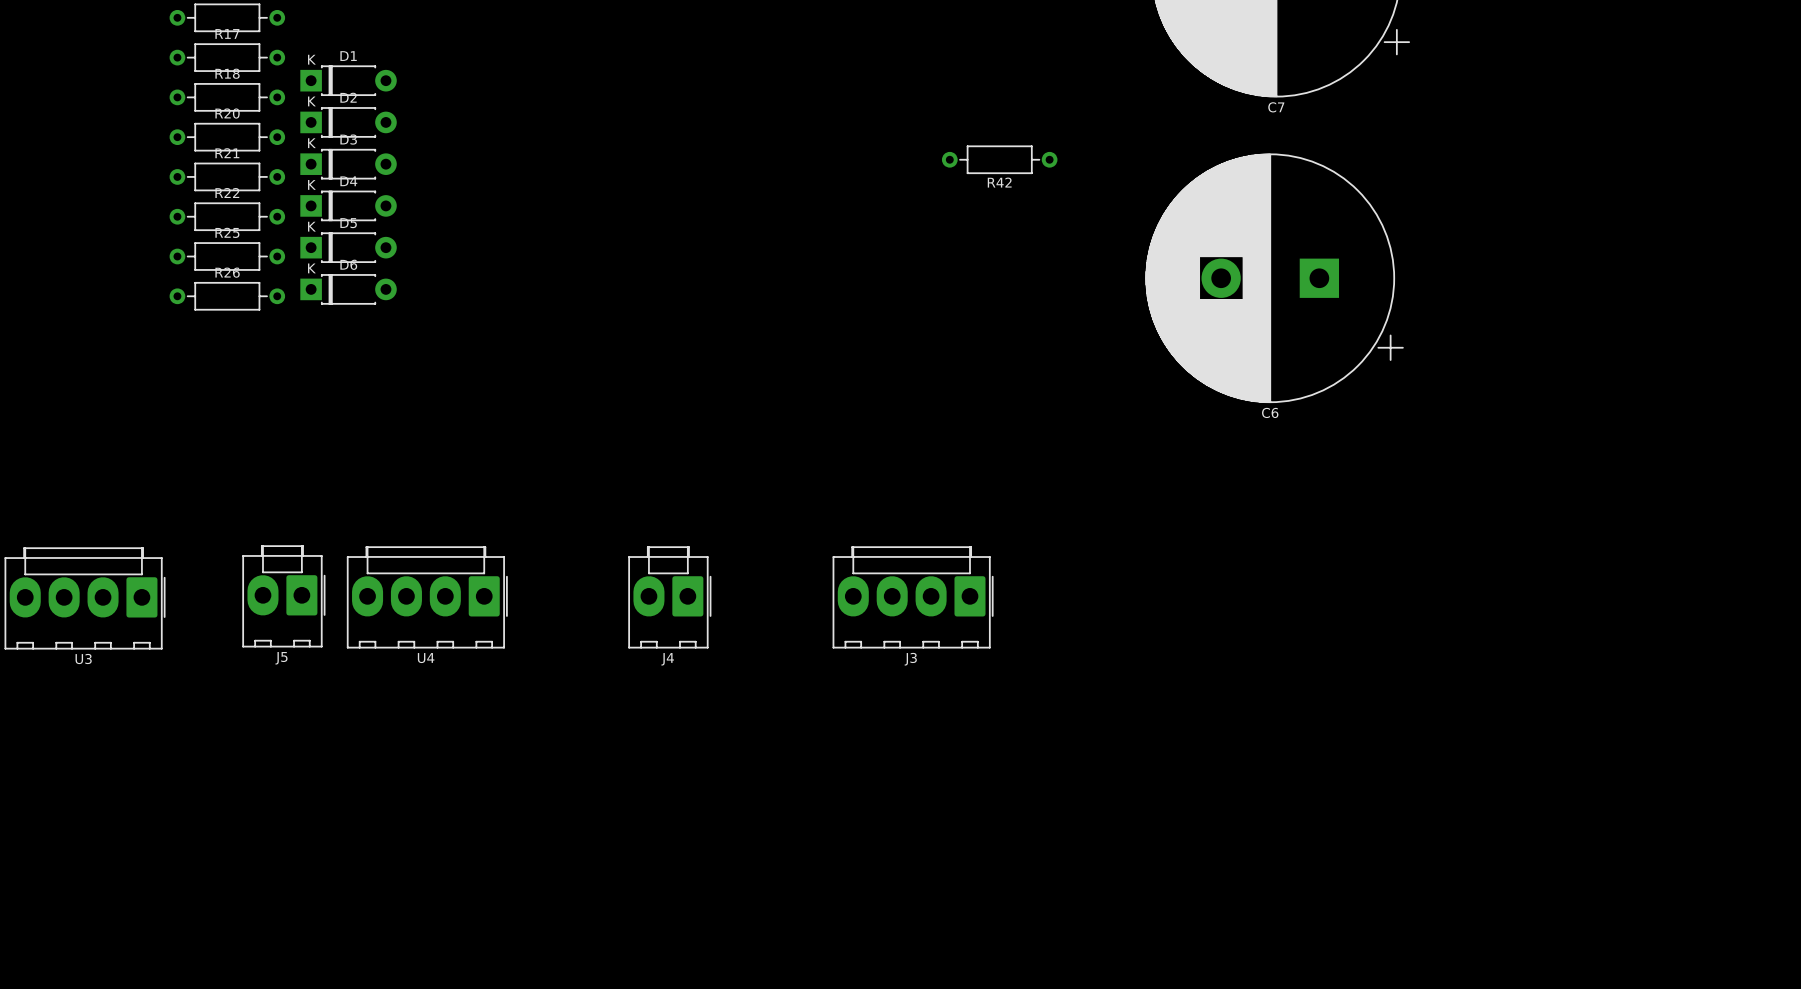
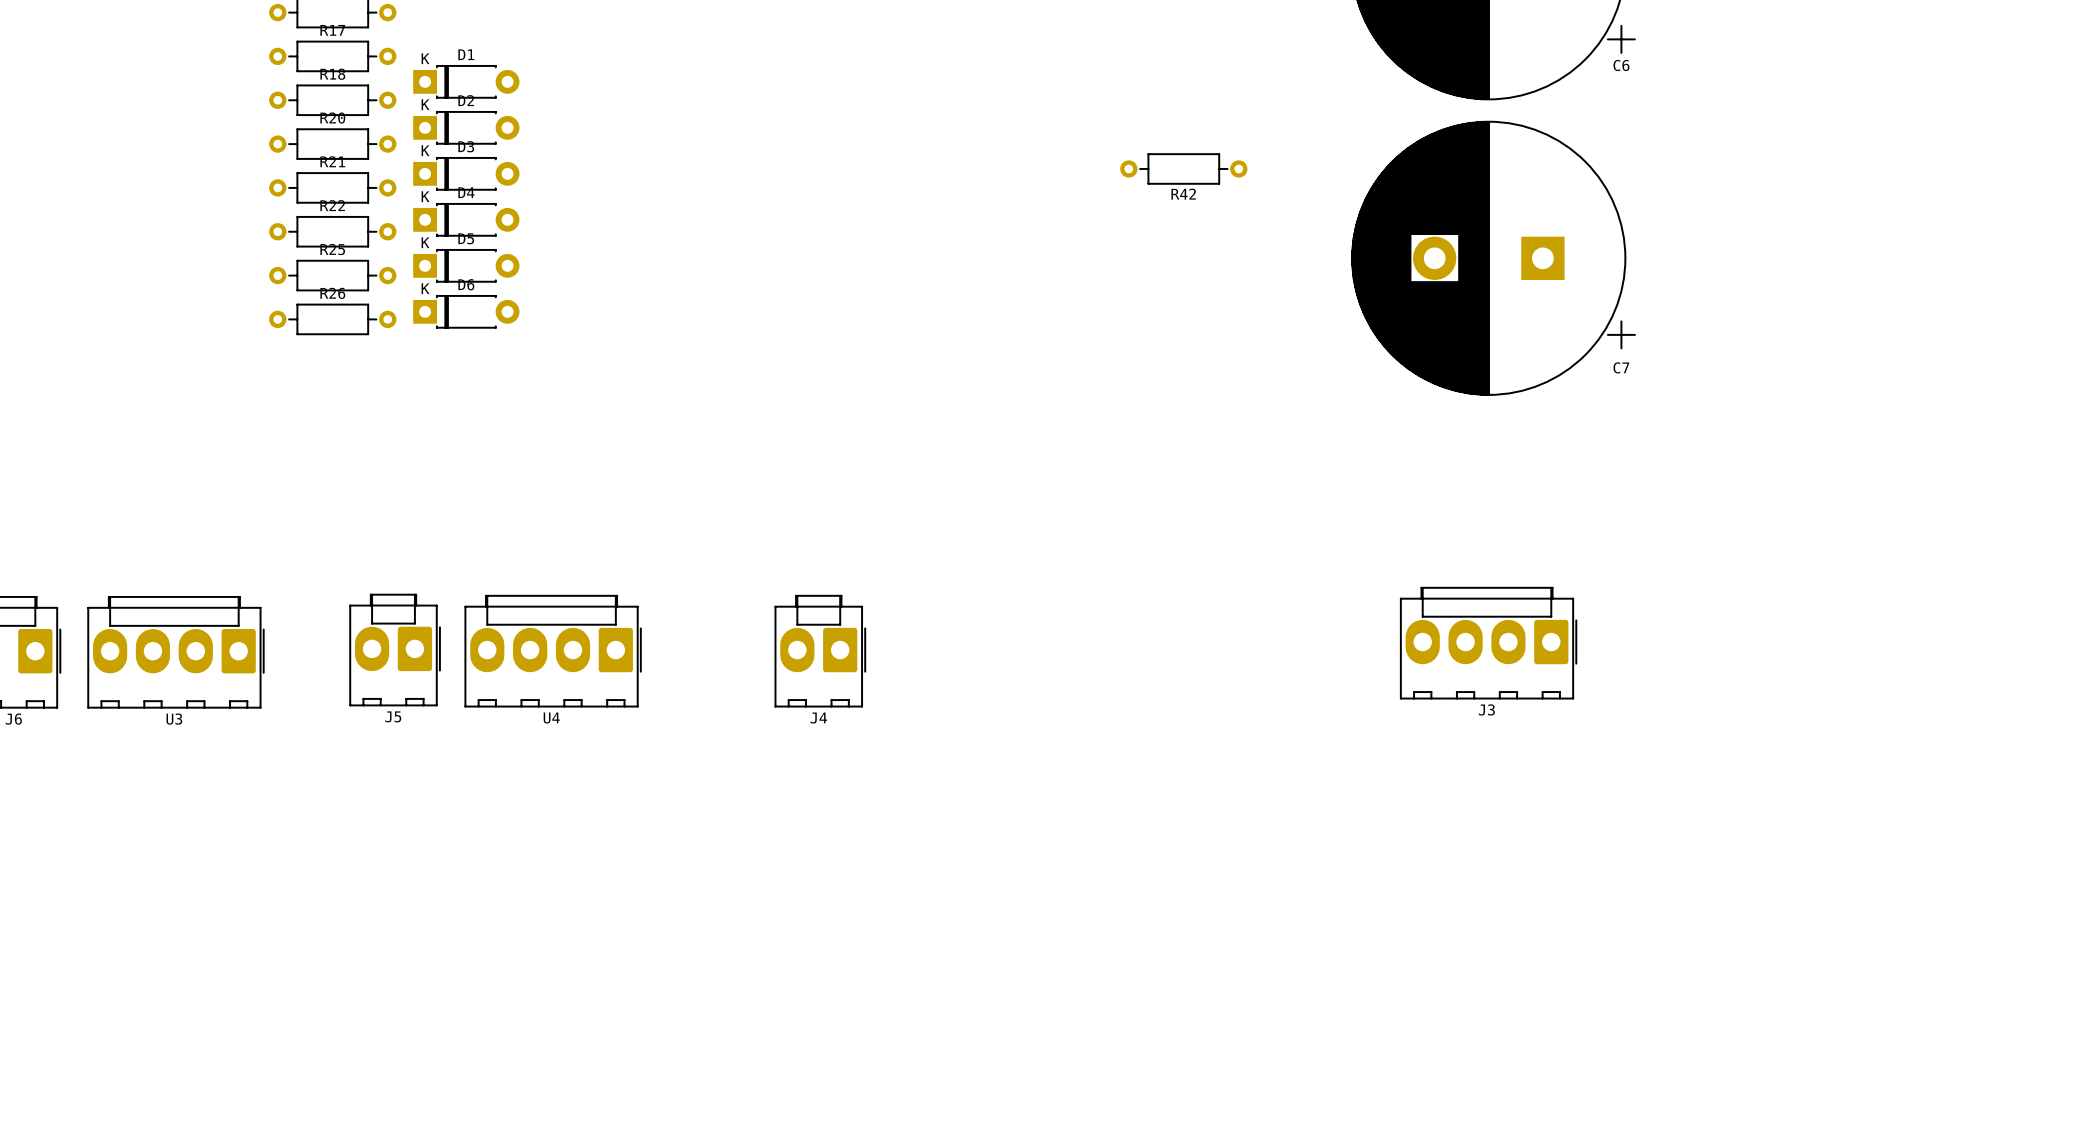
C7 name: C7 (1276, 107) -> C6 (1621, 65)
C7: none -> (1493, 258)
C6: (1274, 278) -> none
J3 position: (913, 597) -> (1488, 643)

